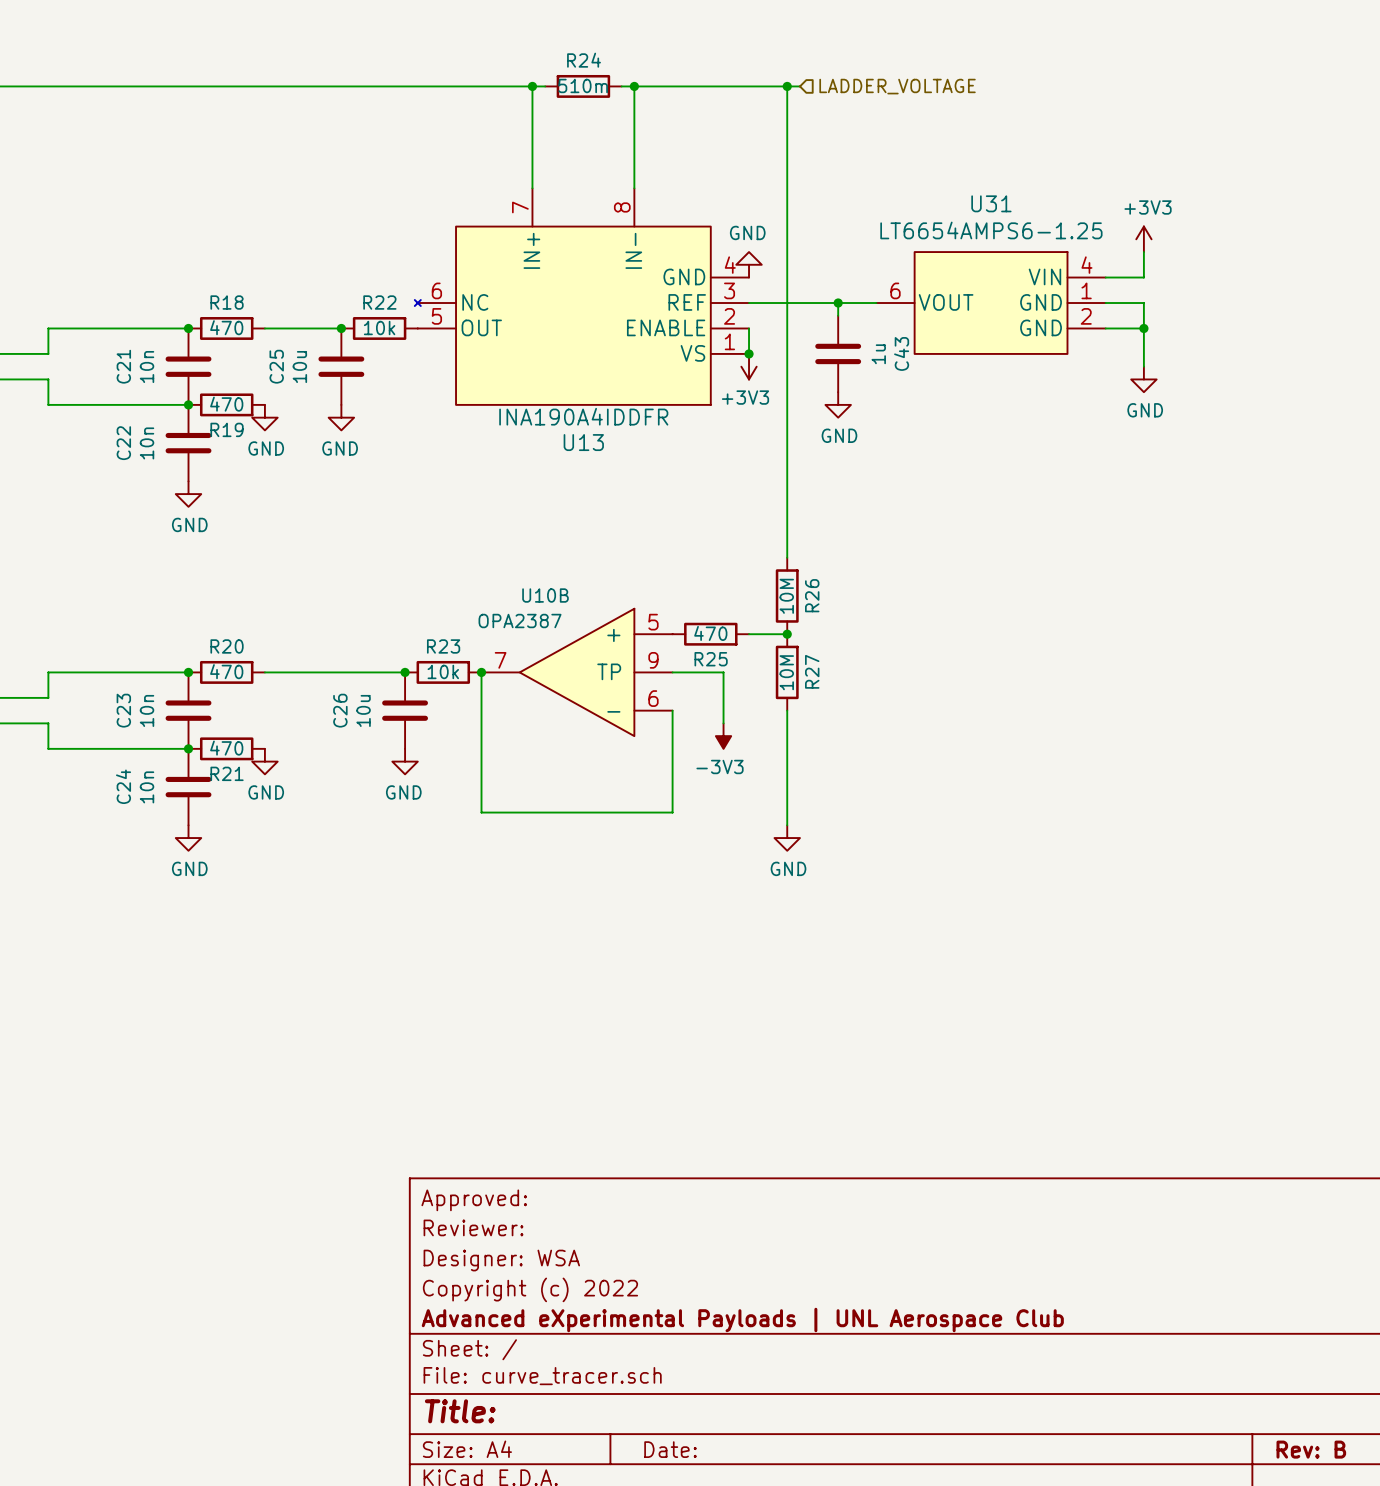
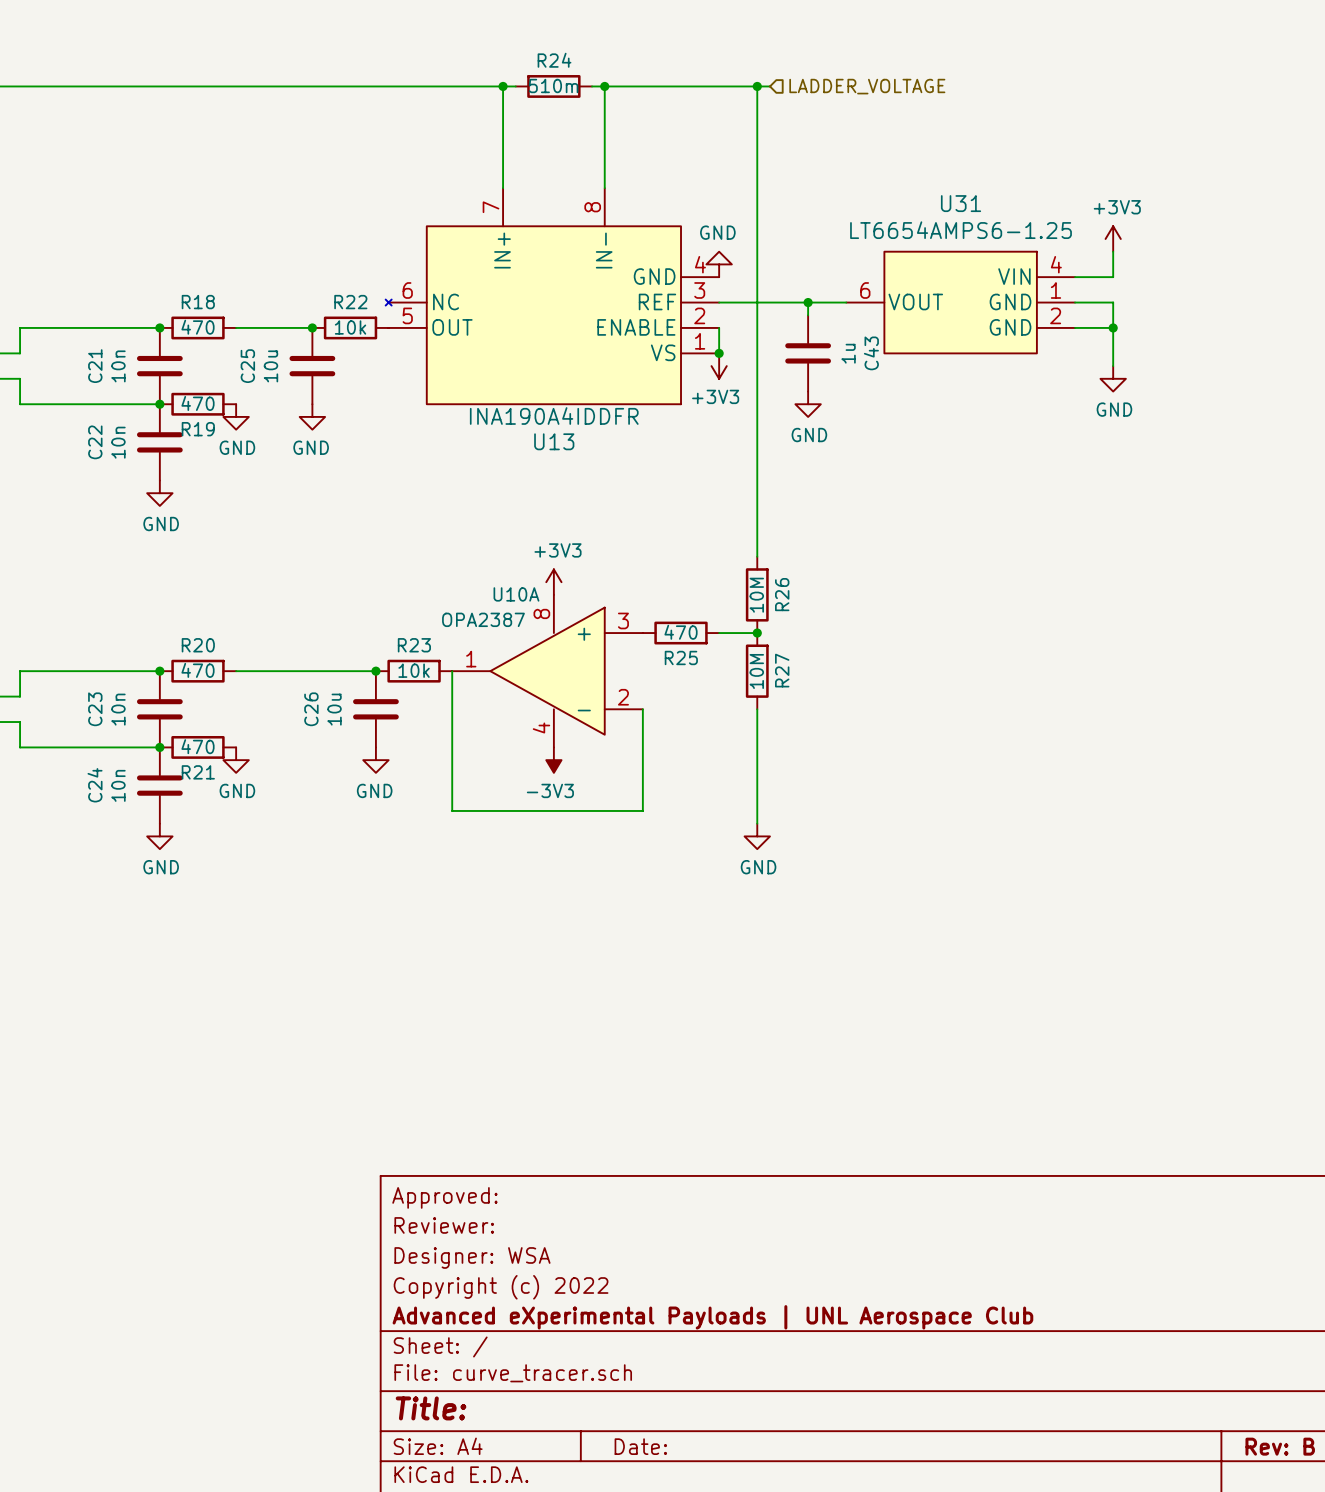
power symbol: none -> +3V3 (553, 582)
junction: (481, 672) -> none
U10B: OPA2387 (577, 672) -> none
U10A: none -> OPA2387 (547, 671)
wire: (672, 672) (723, 672) (723, 723) -> none
power symbol position: -3V3 (723, 736) -> -3V3 (553, 760)

